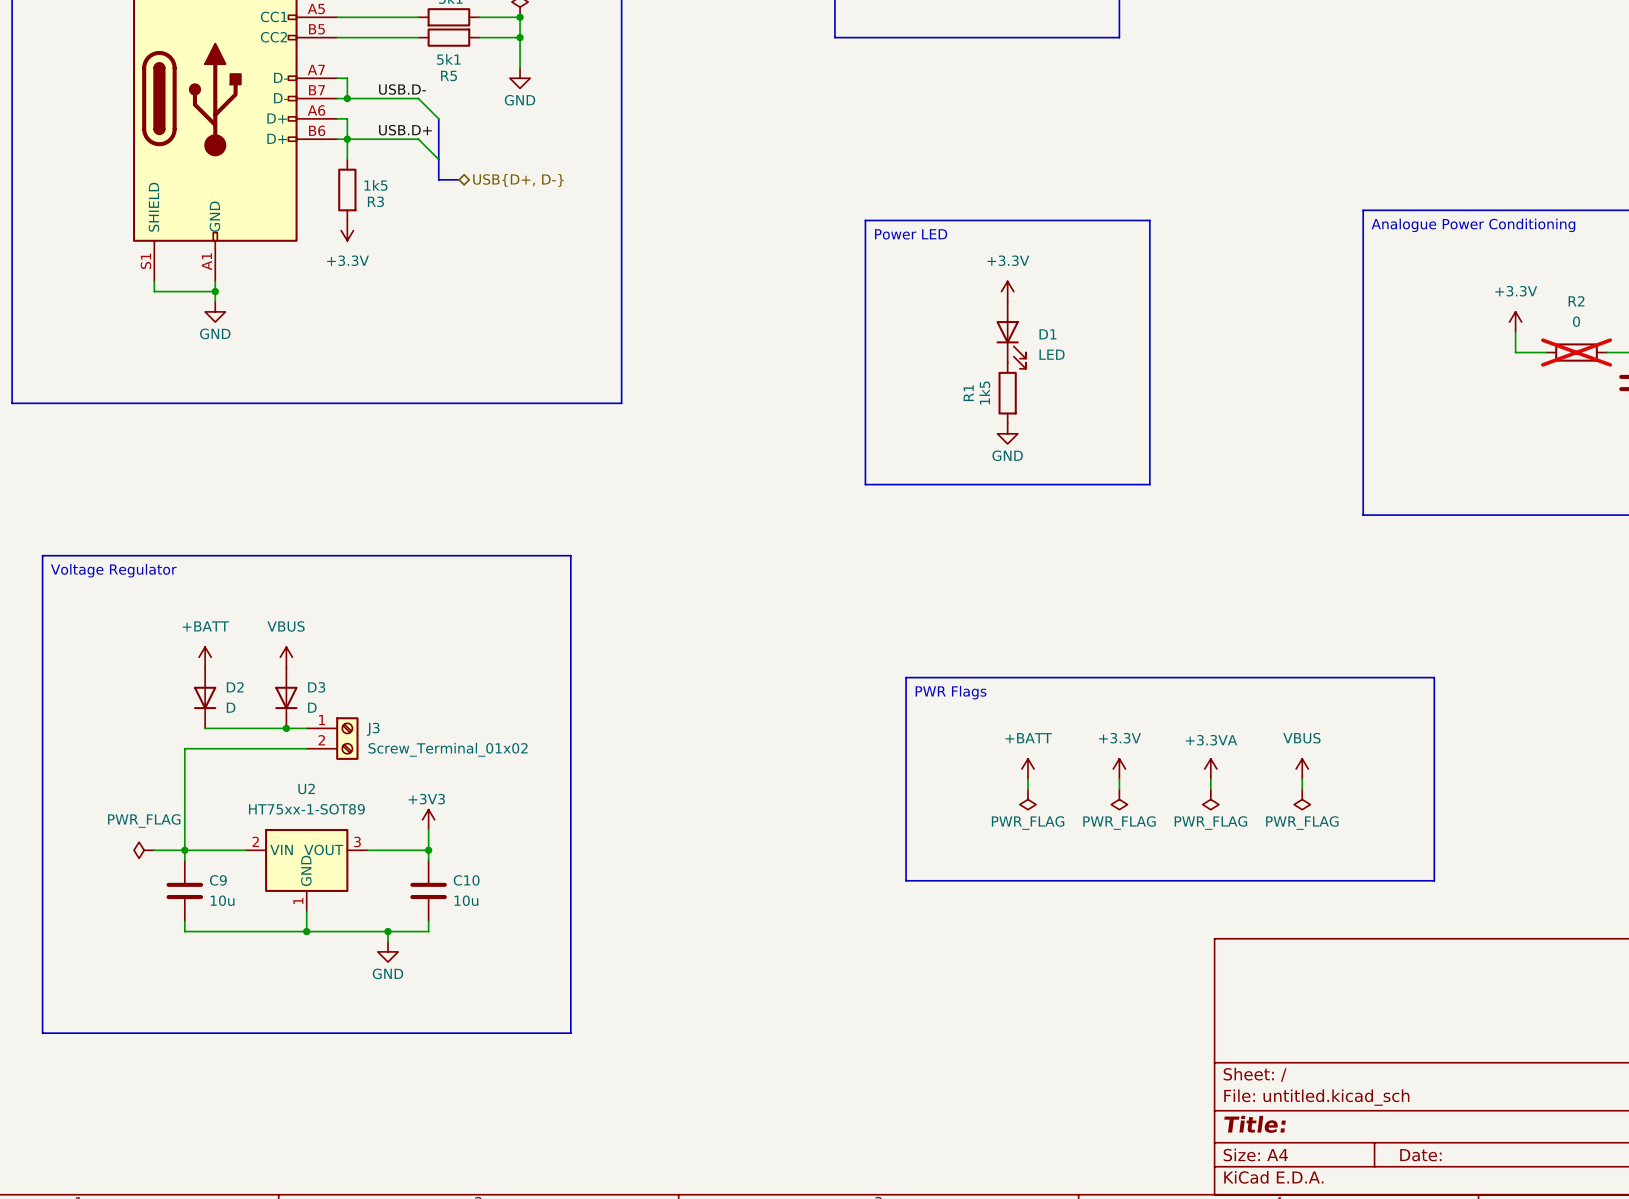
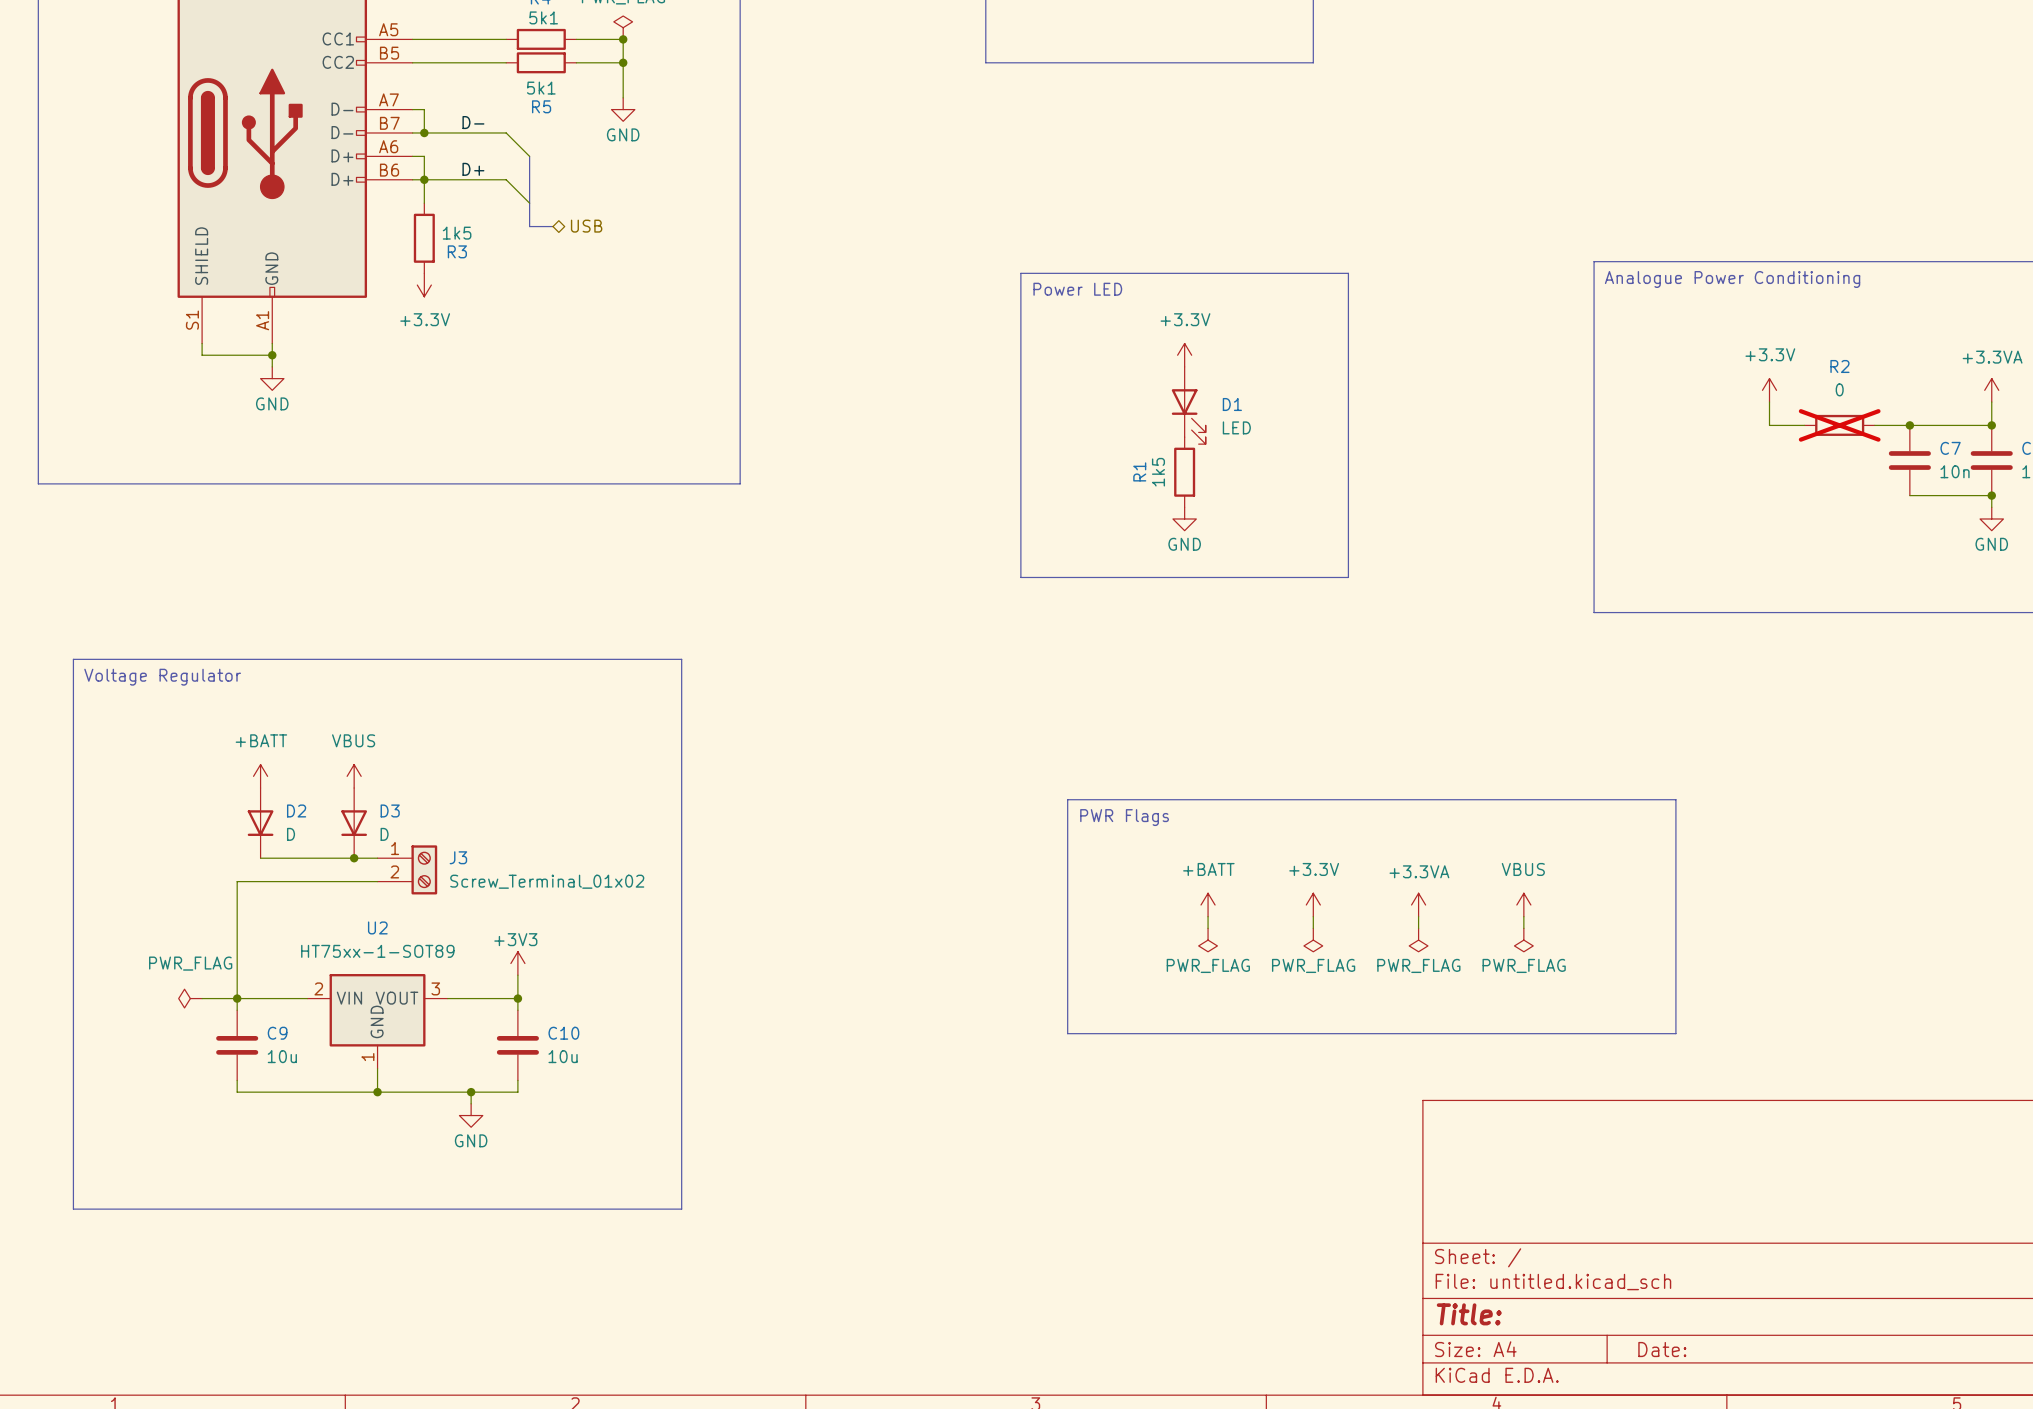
label: USB.D- (402, 89) -> D- (473, 122)
label: USB.D+ (405, 130) -> D+ (473, 169)
hierarchical label: USB{D+, D-} (518, 180) -> USB (586, 226)

